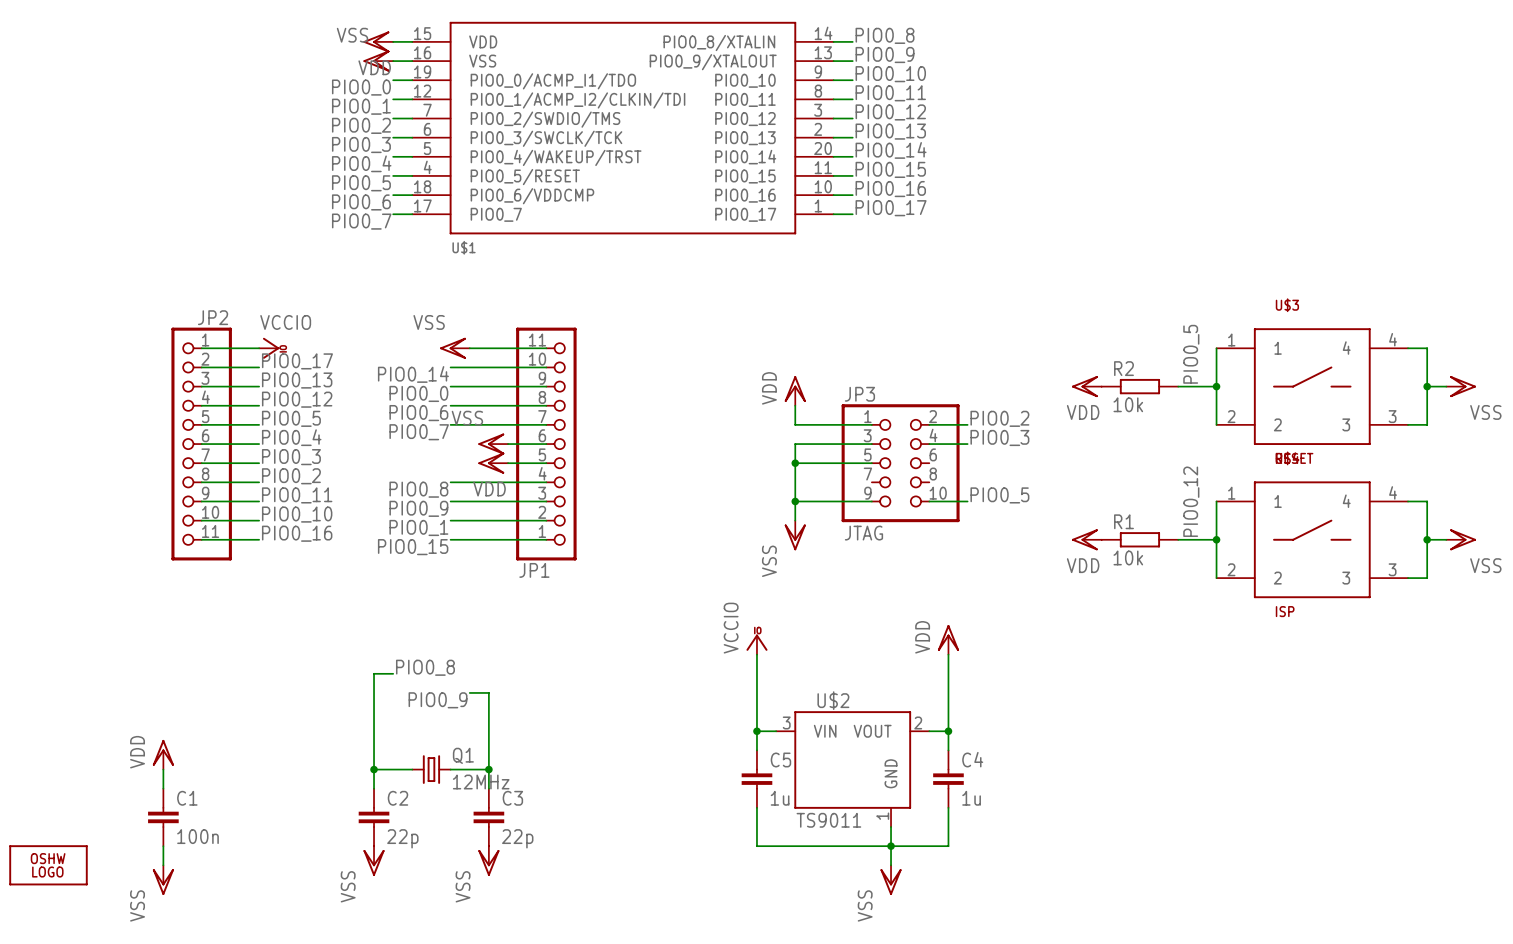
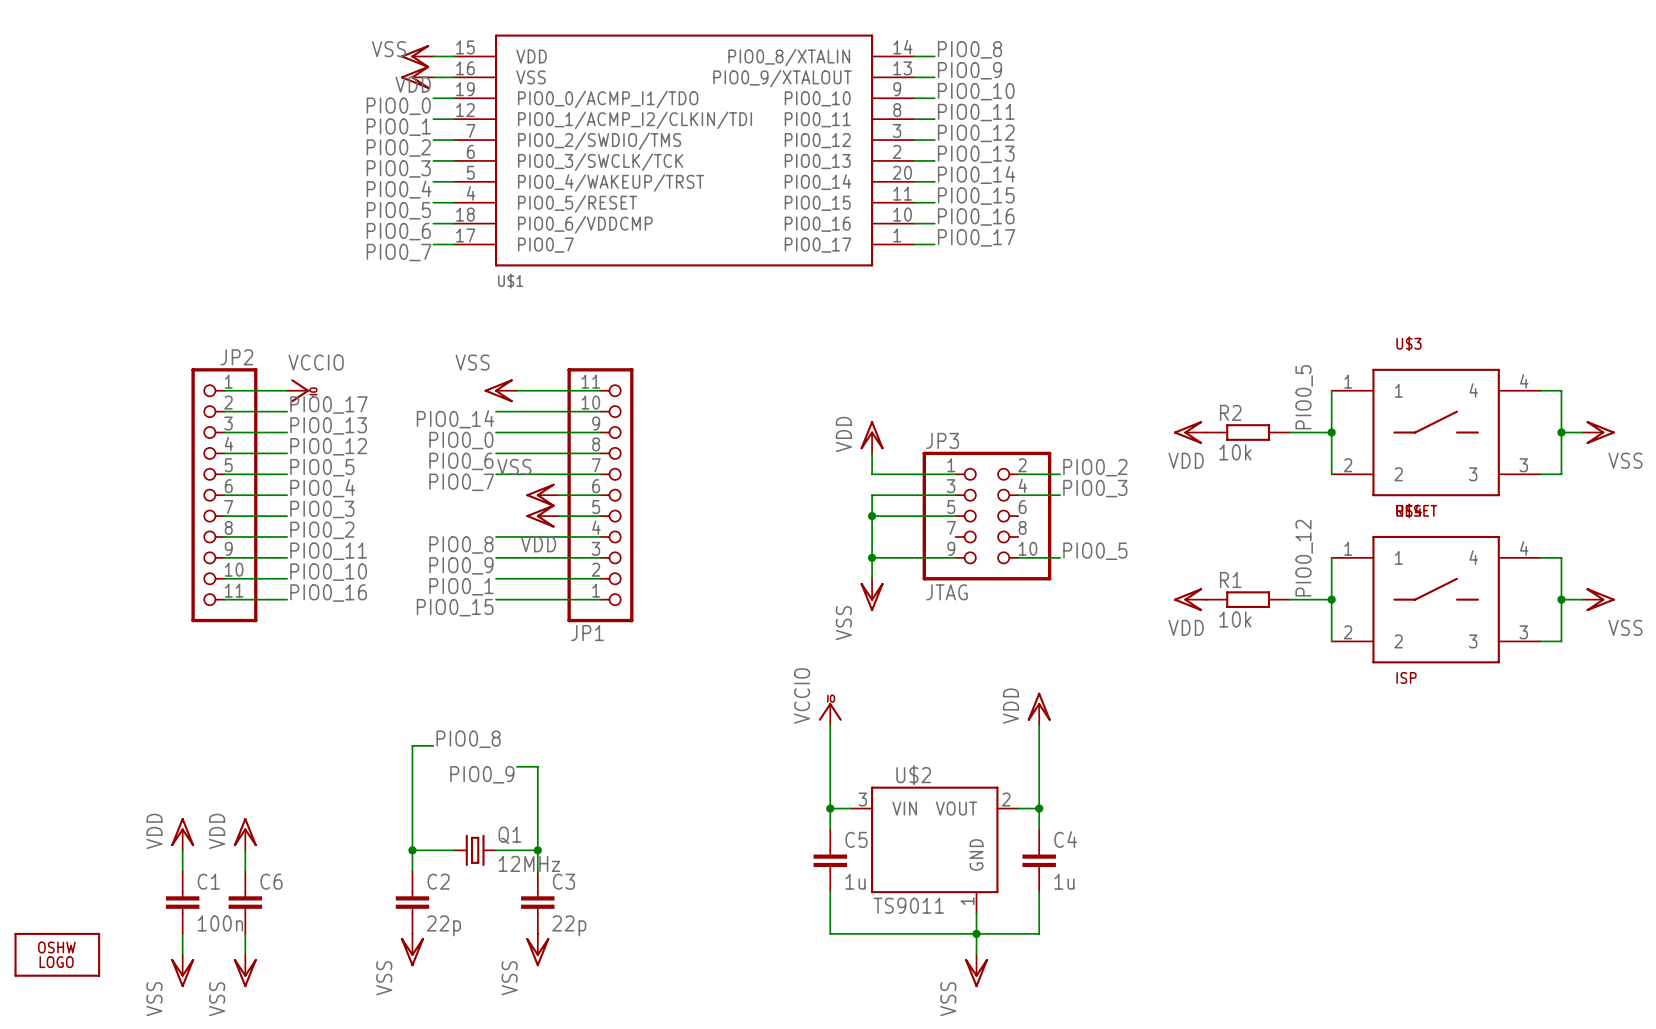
power symbol: none -> VDD (245, 834)
wire: none -> (245, 850) (245, 871)
C6: none -> (245, 902)
wire: none -> (245, 933) (245, 954)
power symbol: none -> VSS (245, 970)

